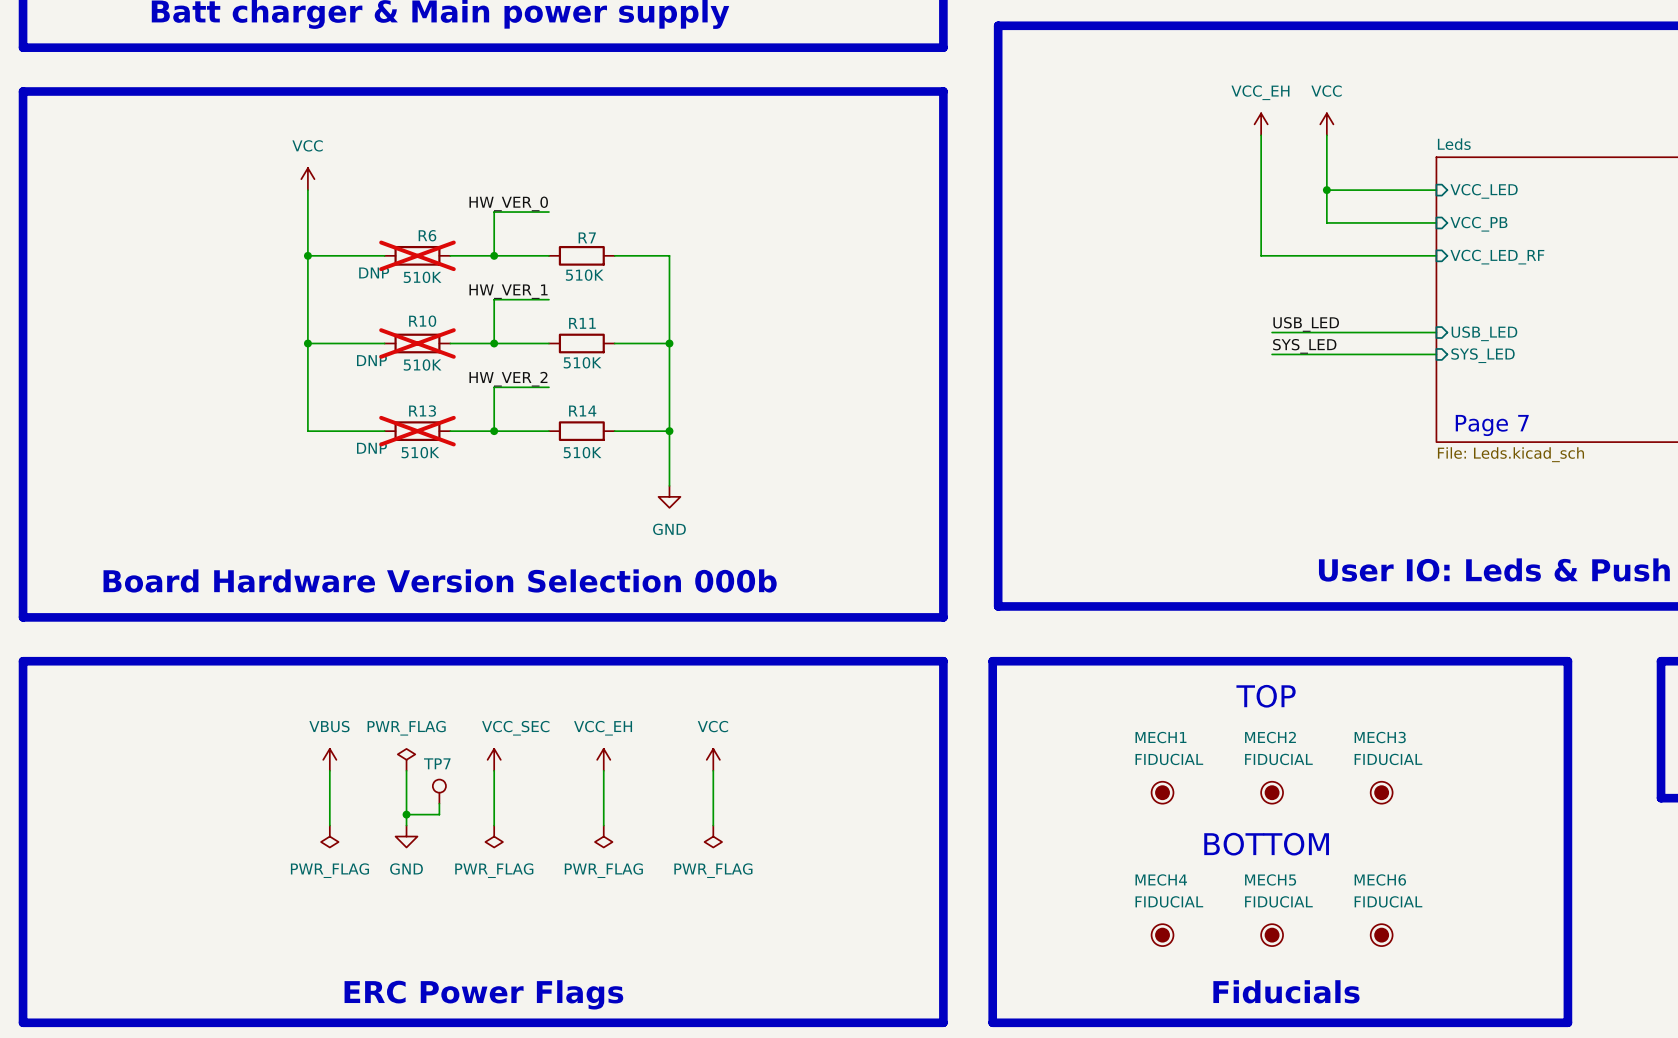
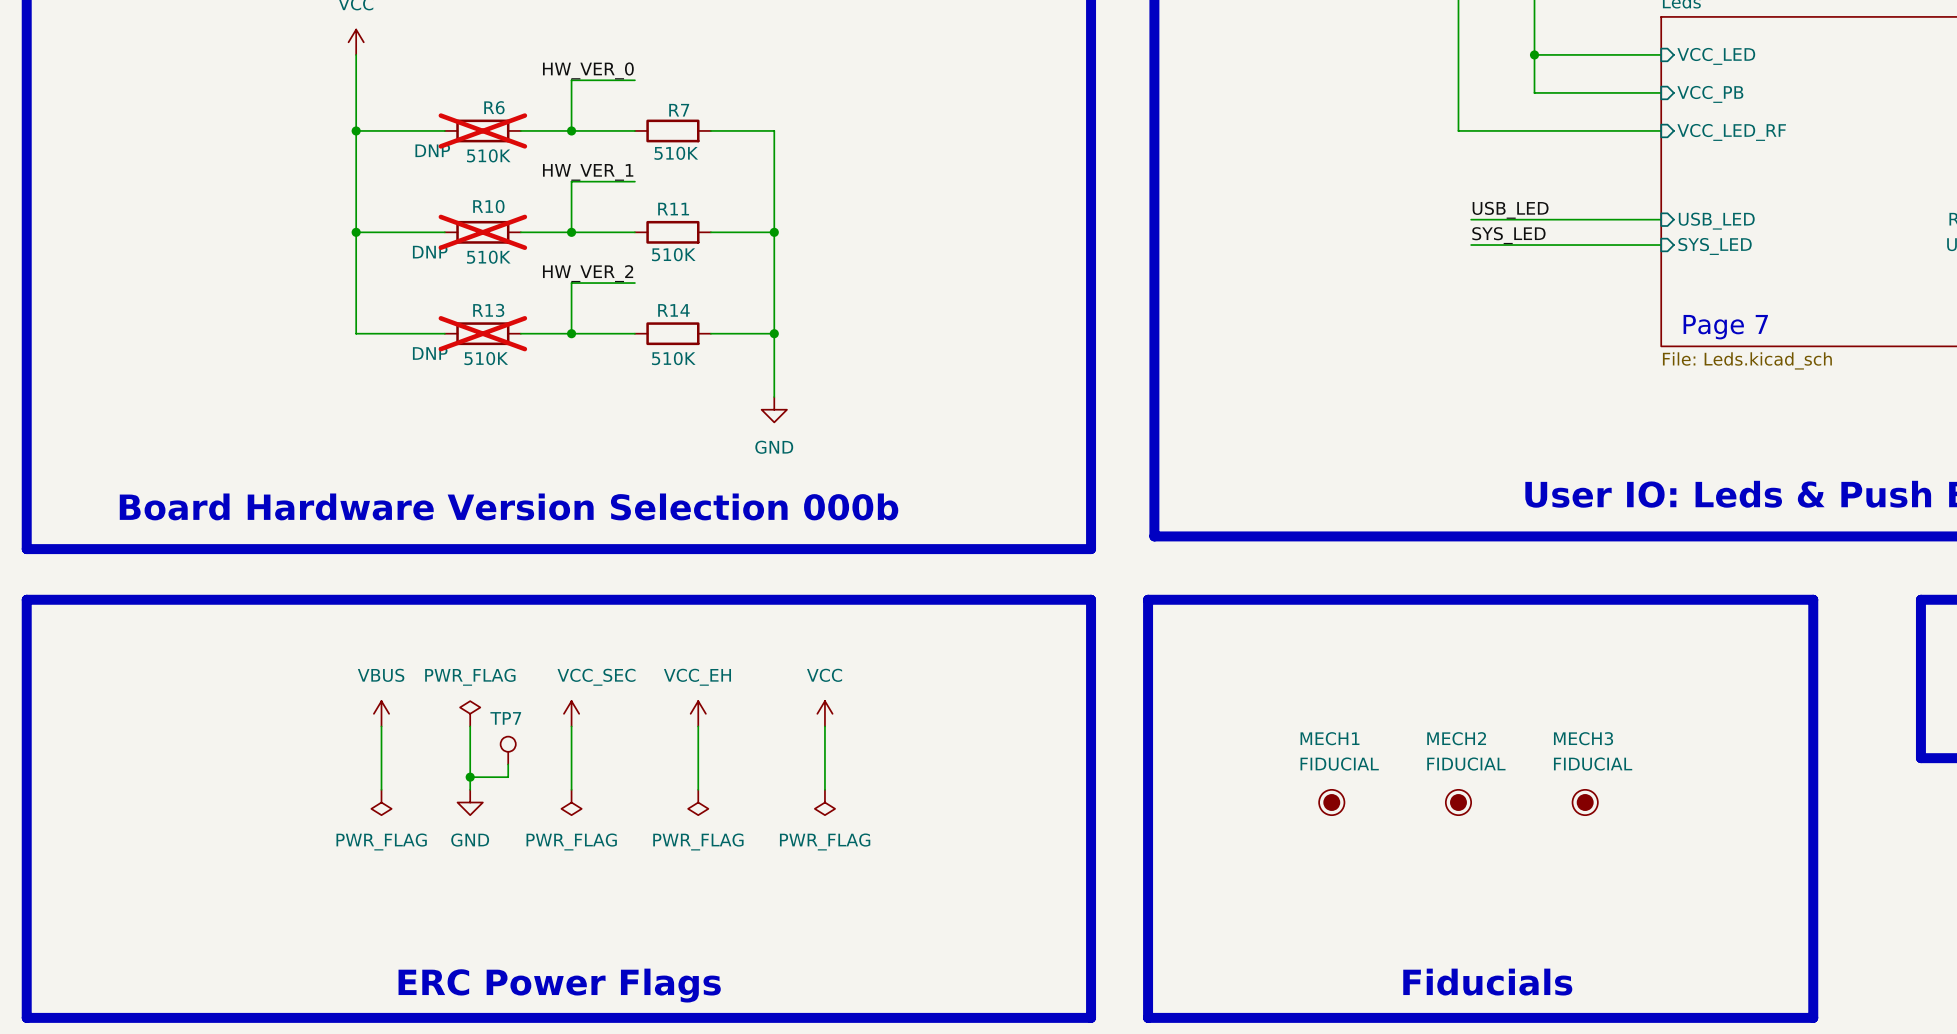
text: TOP (1266, 696) -> none
MECH1 position: (1162, 792) -> (1331, 802)
MECH2 position: (1272, 792) -> (1458, 802)
MECH3 position: (1381, 792) -> (1585, 802)
text: BOTTOM (1266, 844) -> none
MECH4: FIDUCIAL (1162, 935) -> none
MECH5: FIDUCIAL (1272, 935) -> none
MECH6: FIDUCIAL (1381, 935) -> none

